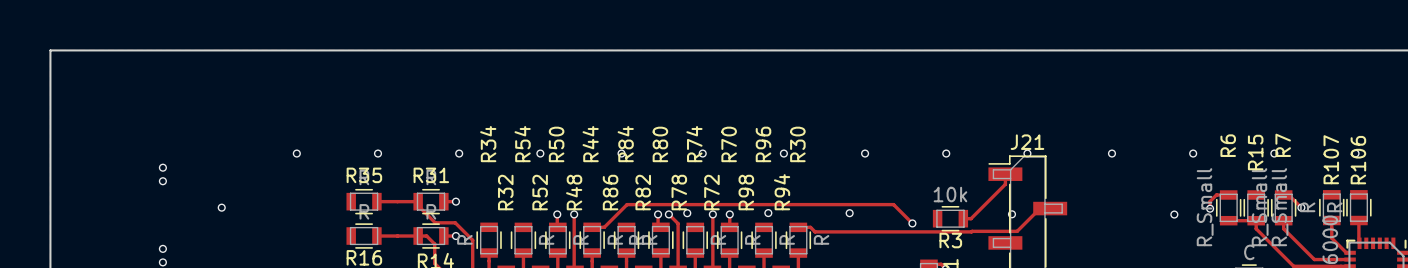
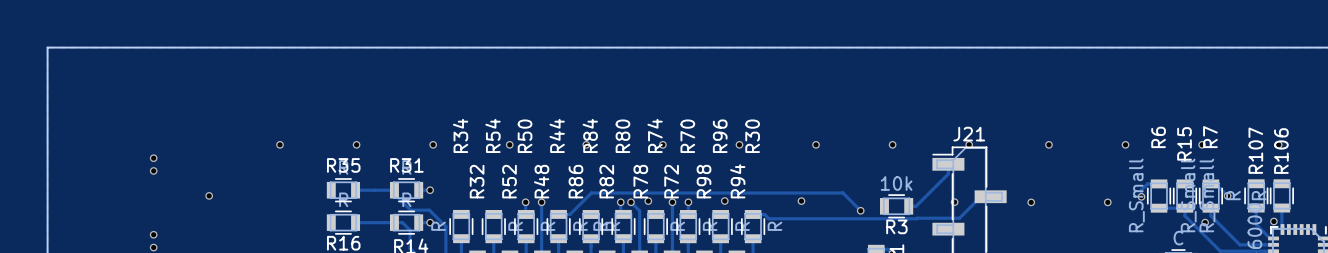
via: none -> (1031, 202)
via: none -> (1273, 221)
via: none -> (1205, 222)

